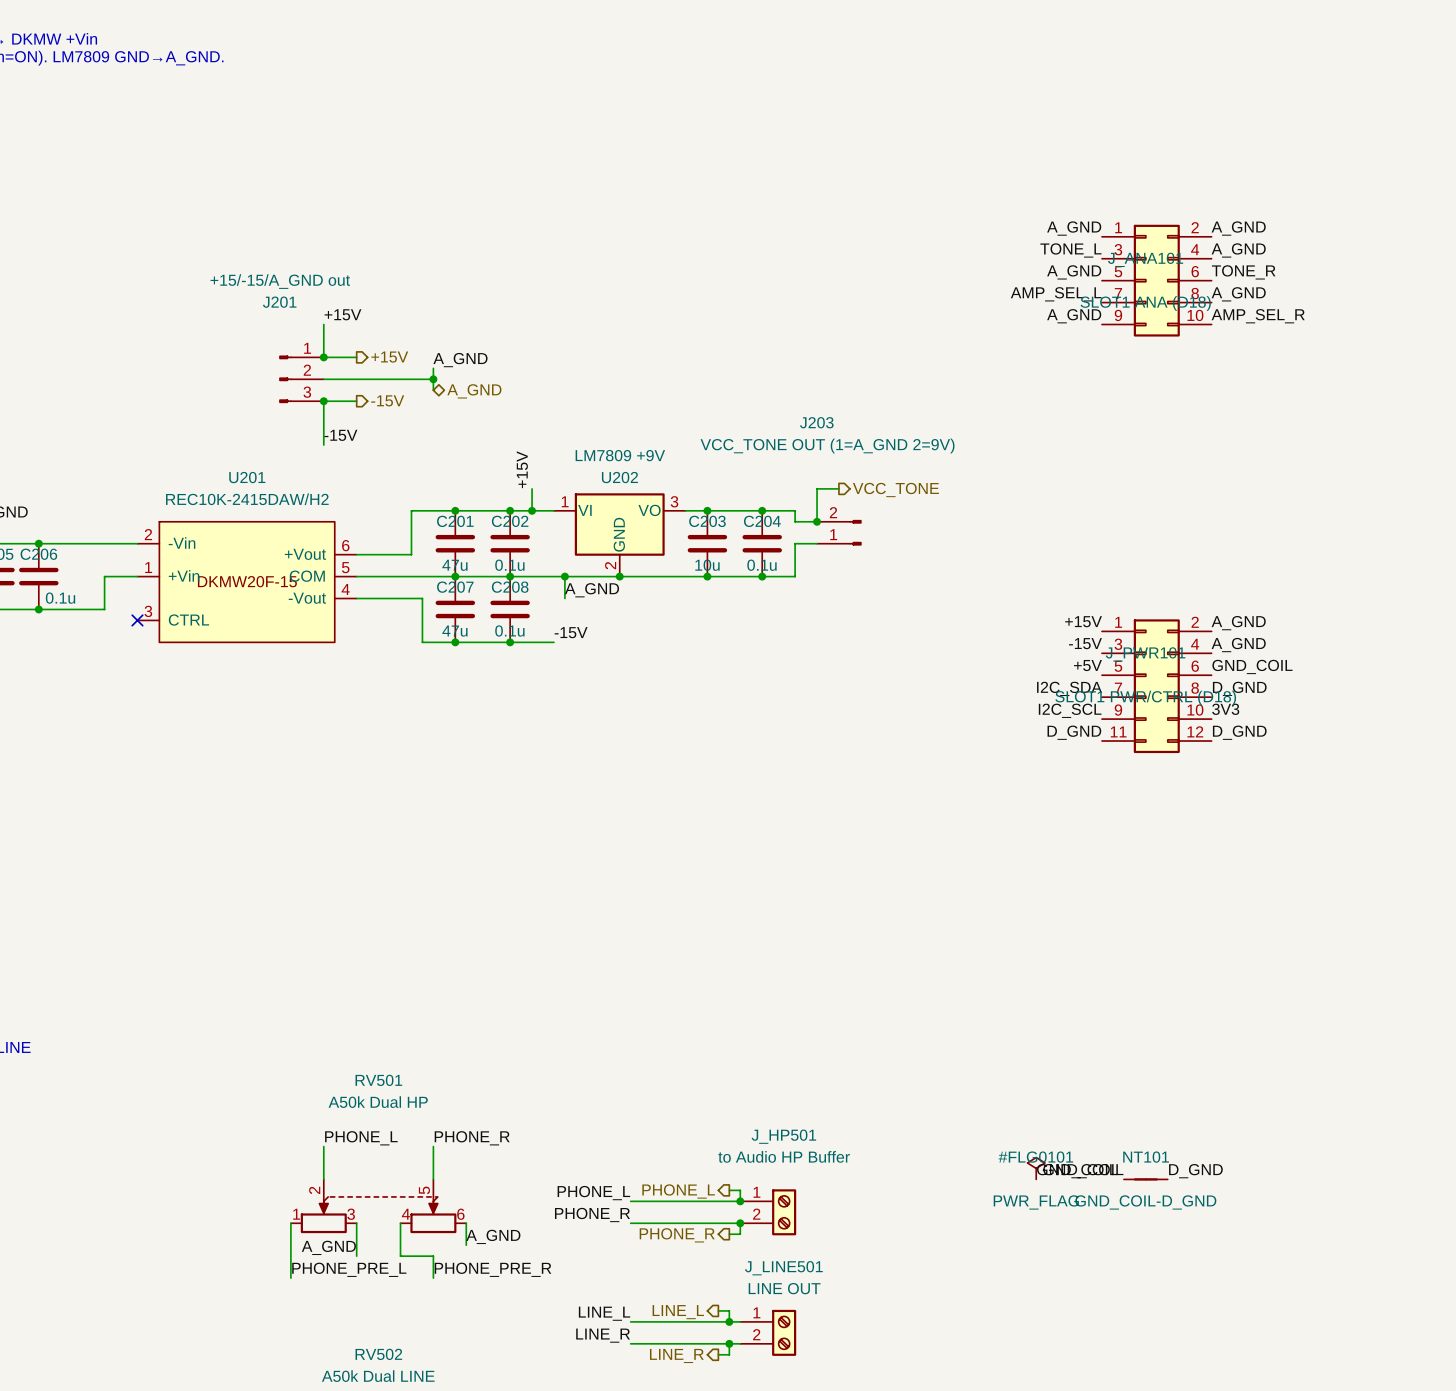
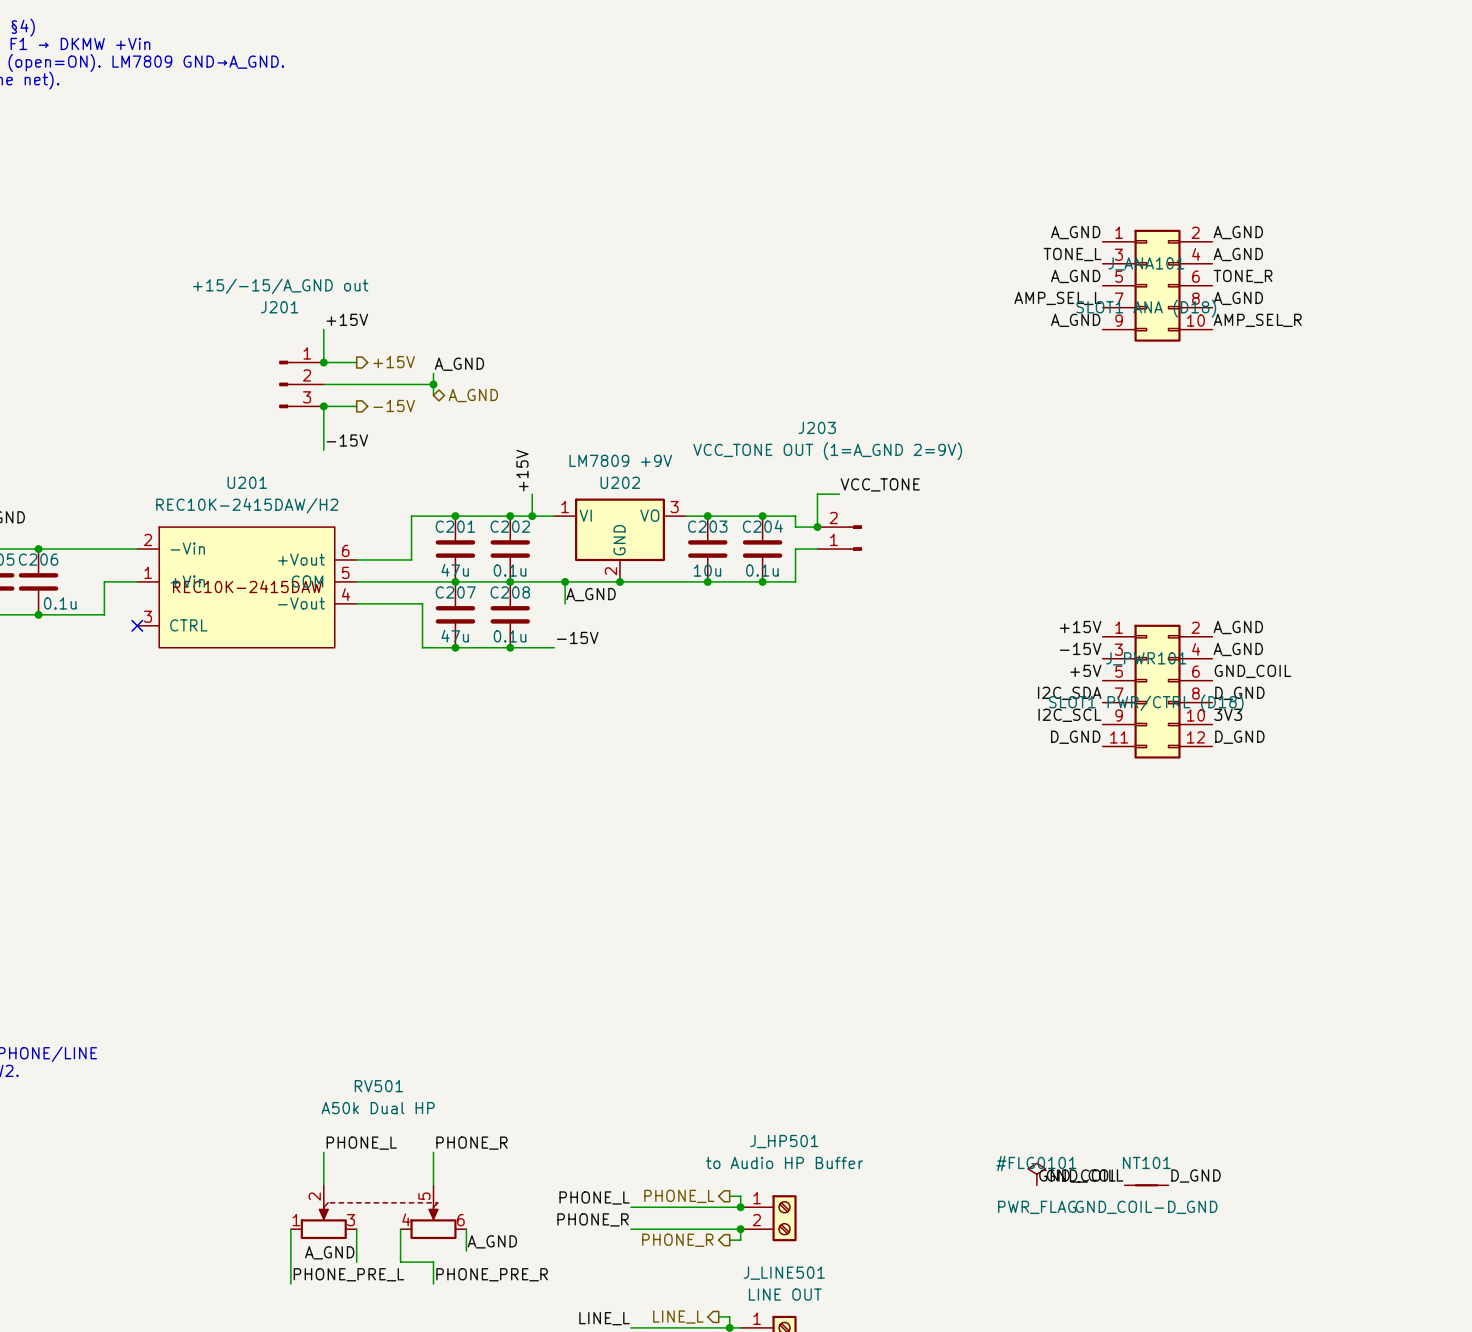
label: none -> VCC_TONE (880, 484)
hierarchical label: VCC_TONE (895, 490) -> none
U201 text: DKMW20F-15 (247, 581) -> REC10K-2415DAW (247, 586)

